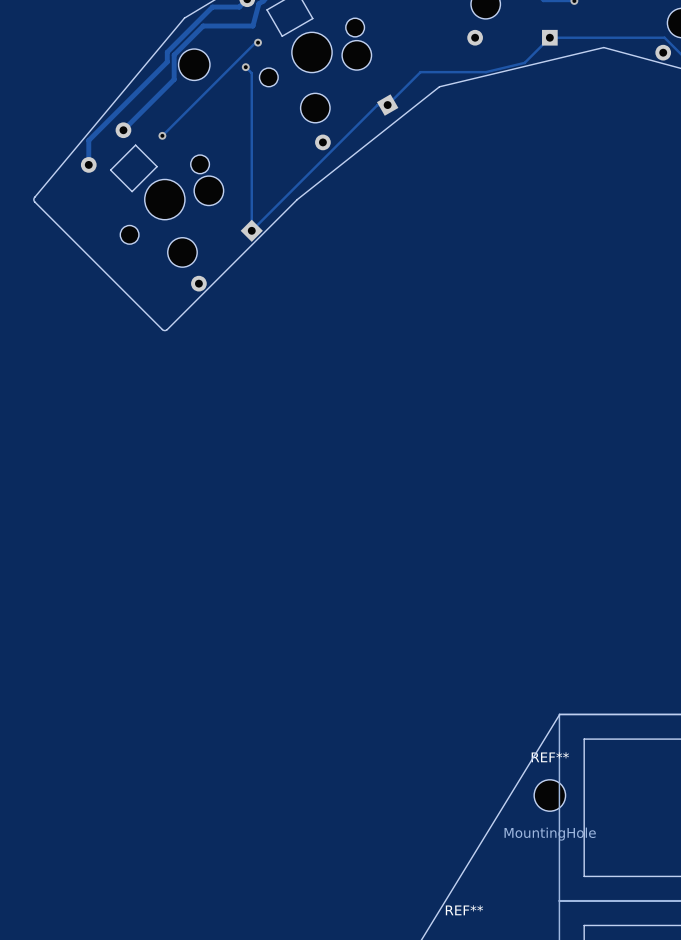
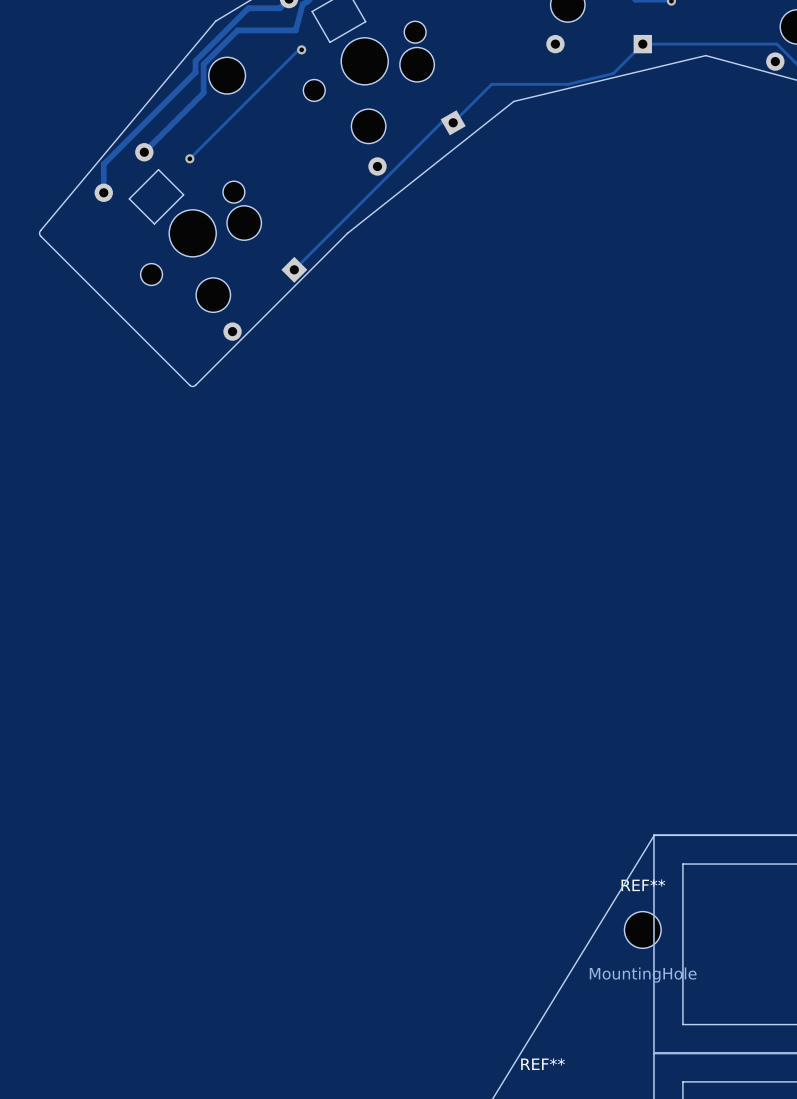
track: (245, 67) (251, 73) (251, 230) -> none
via: (245, 67) -> none

